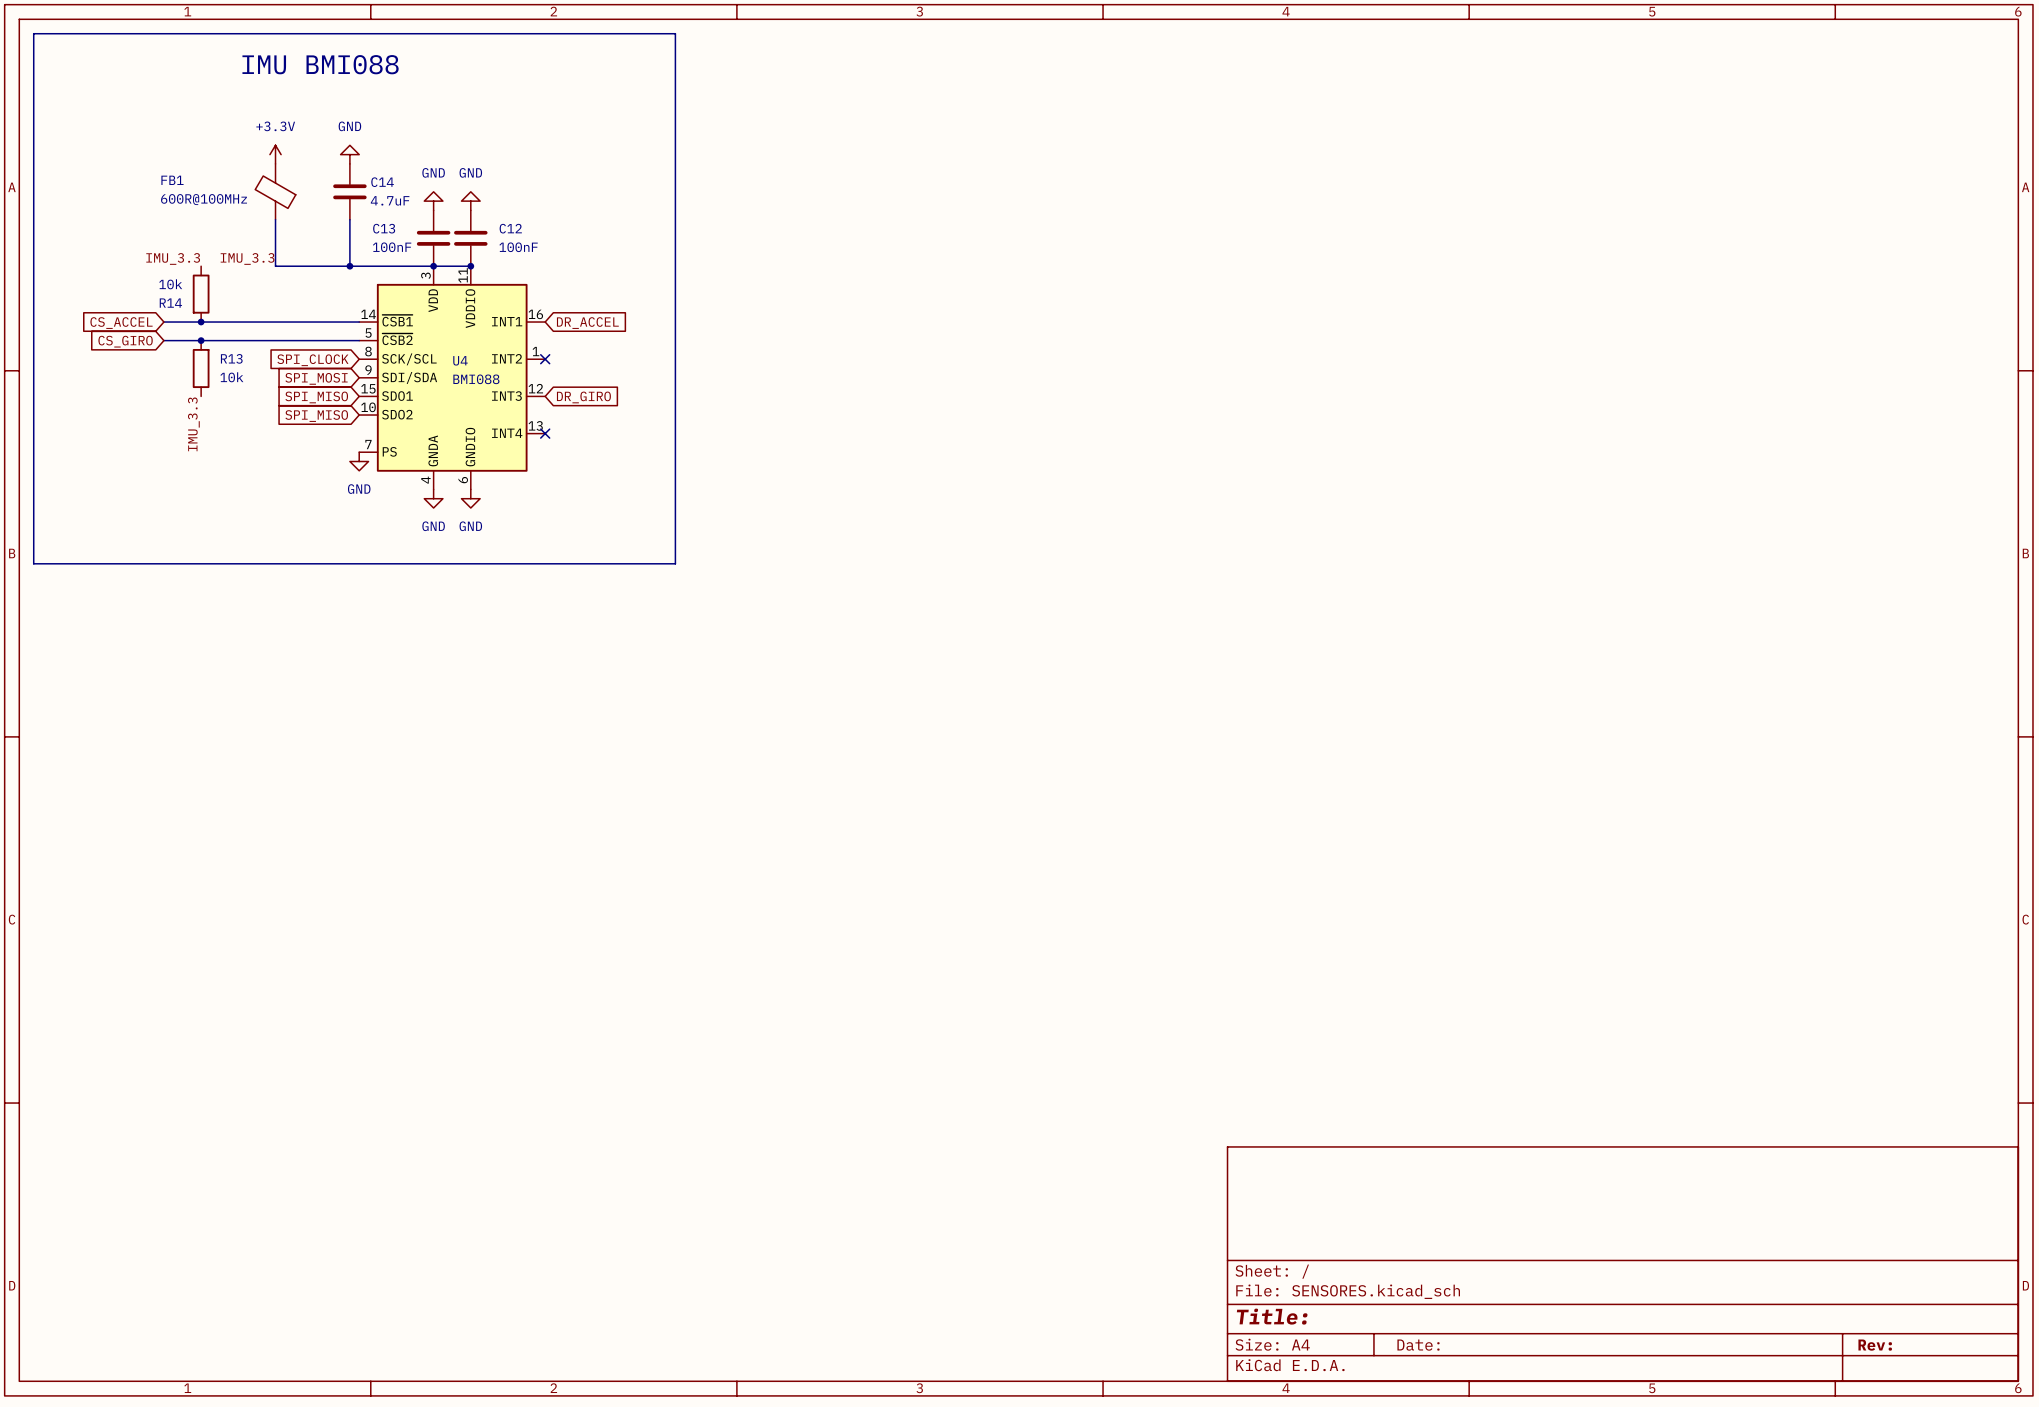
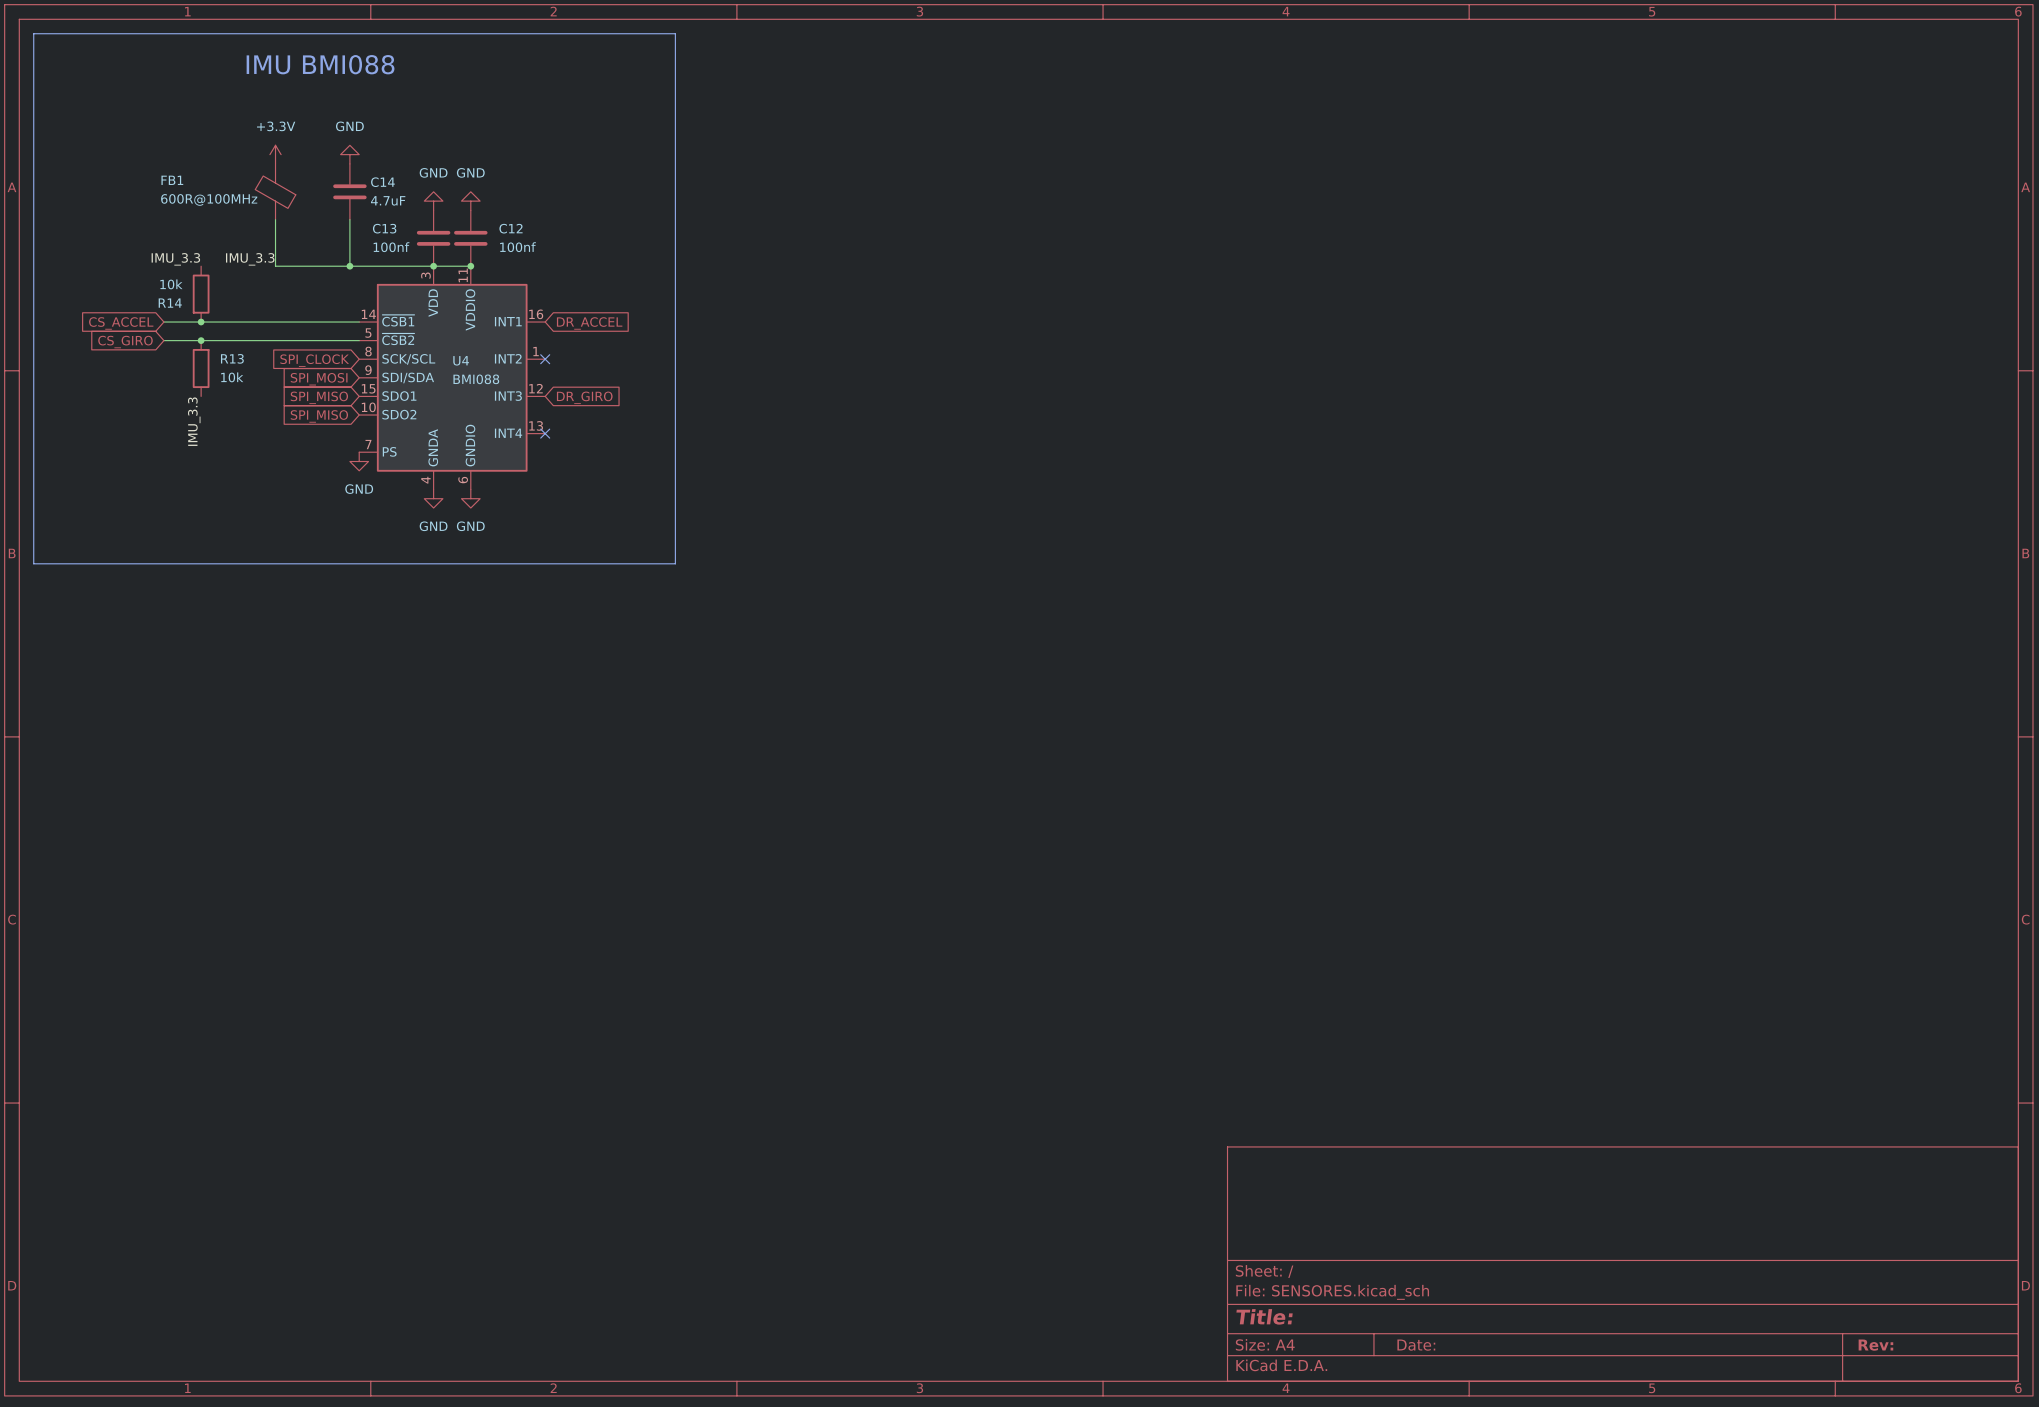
C13 value: 100nF (392, 247) -> 100nf (391, 247)
C12 value: 100nF (518, 247) -> 100nf (517, 247)

